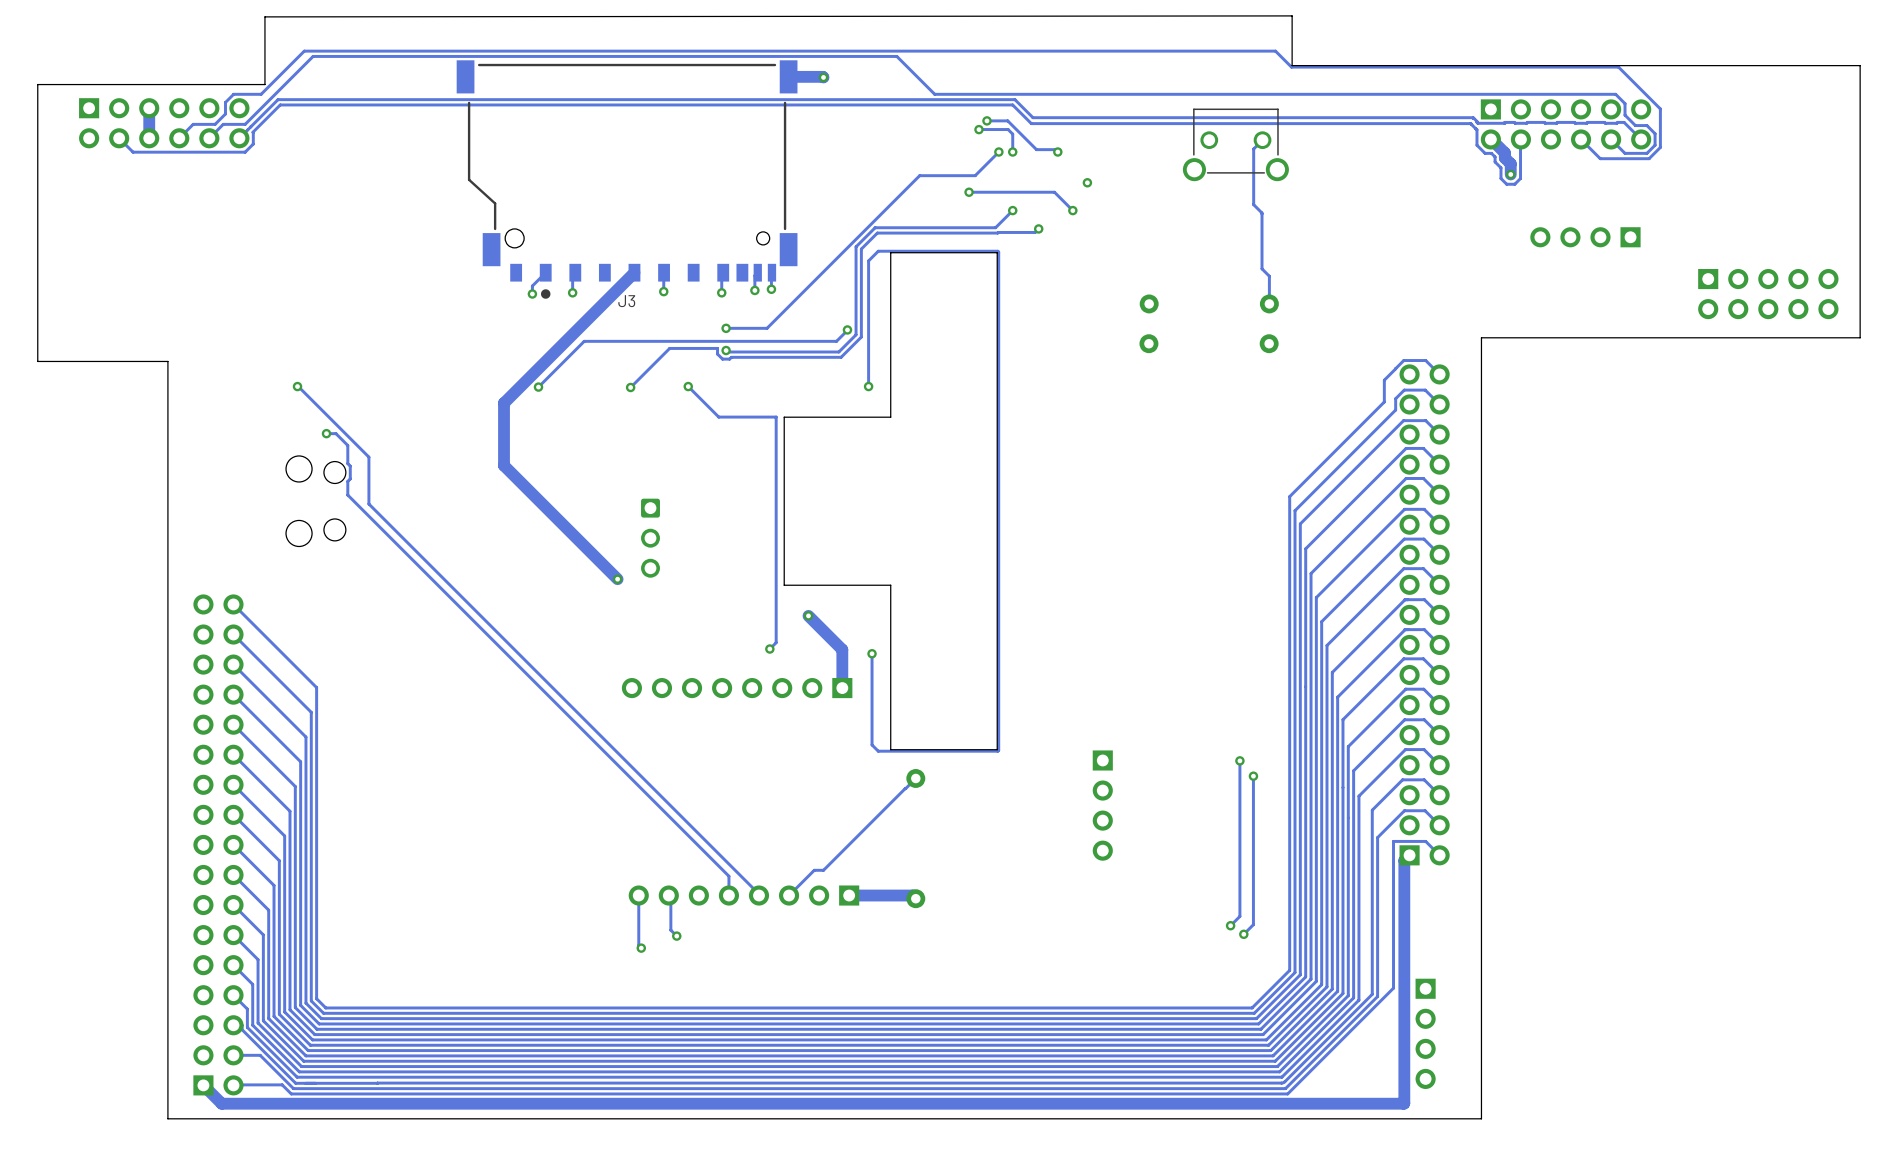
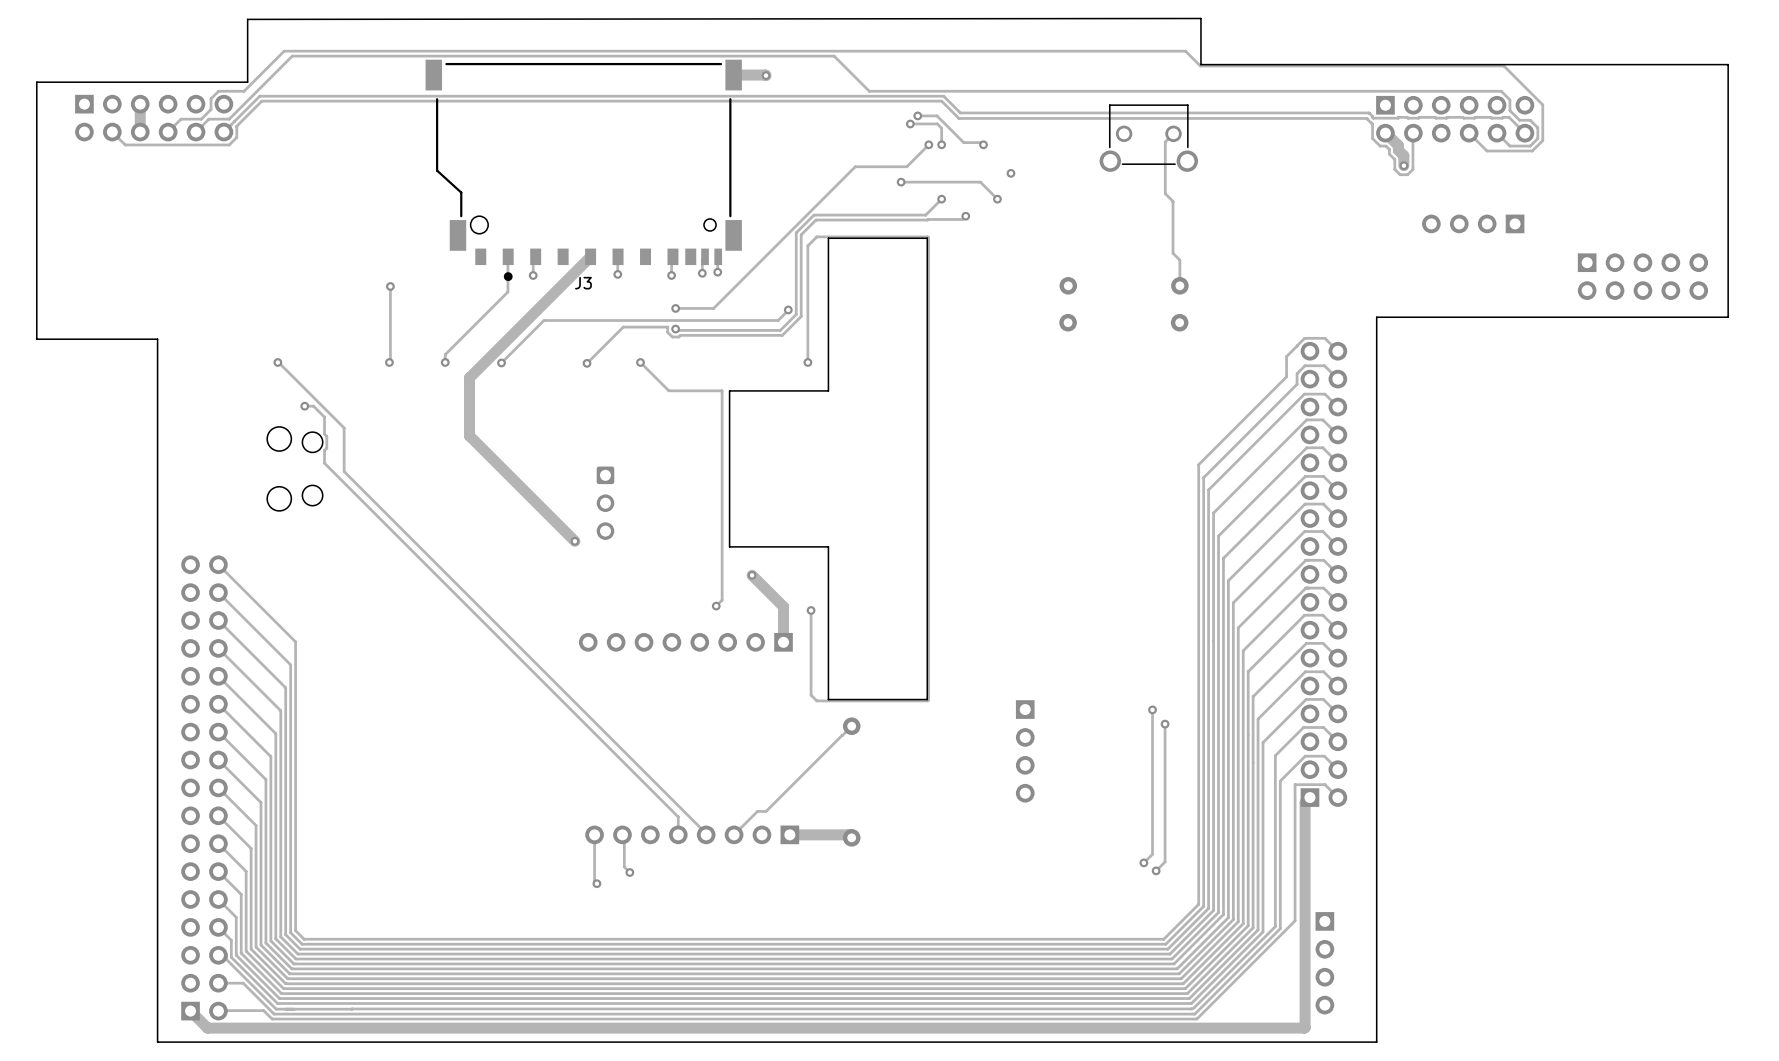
track: (545, 273) (532, 286) (532, 294) -> (507, 257) (507, 291) (445, 354) (445, 362) (447, 360)
via: (532, 294) -> none
track: none -> (390, 286) (389, 362)
via: none -> (390, 286)
via: none -> (389, 362)
via: none -> (445, 362)

